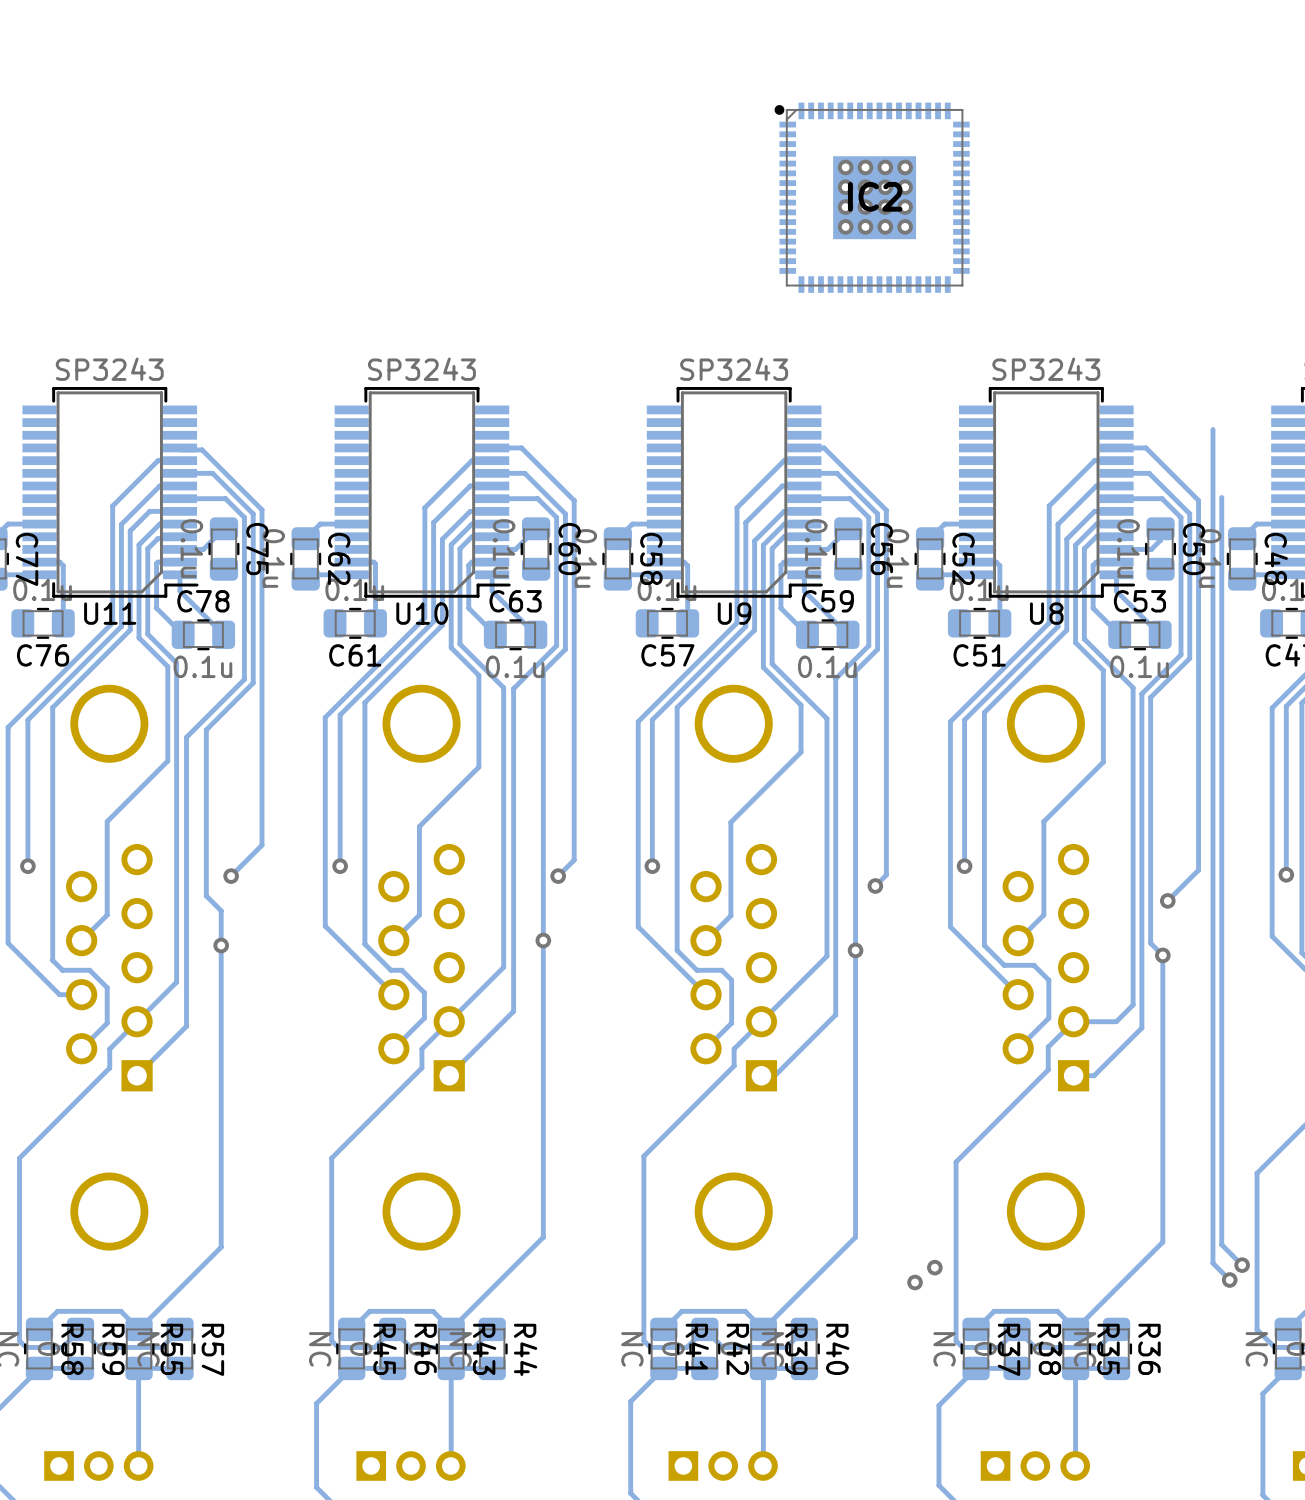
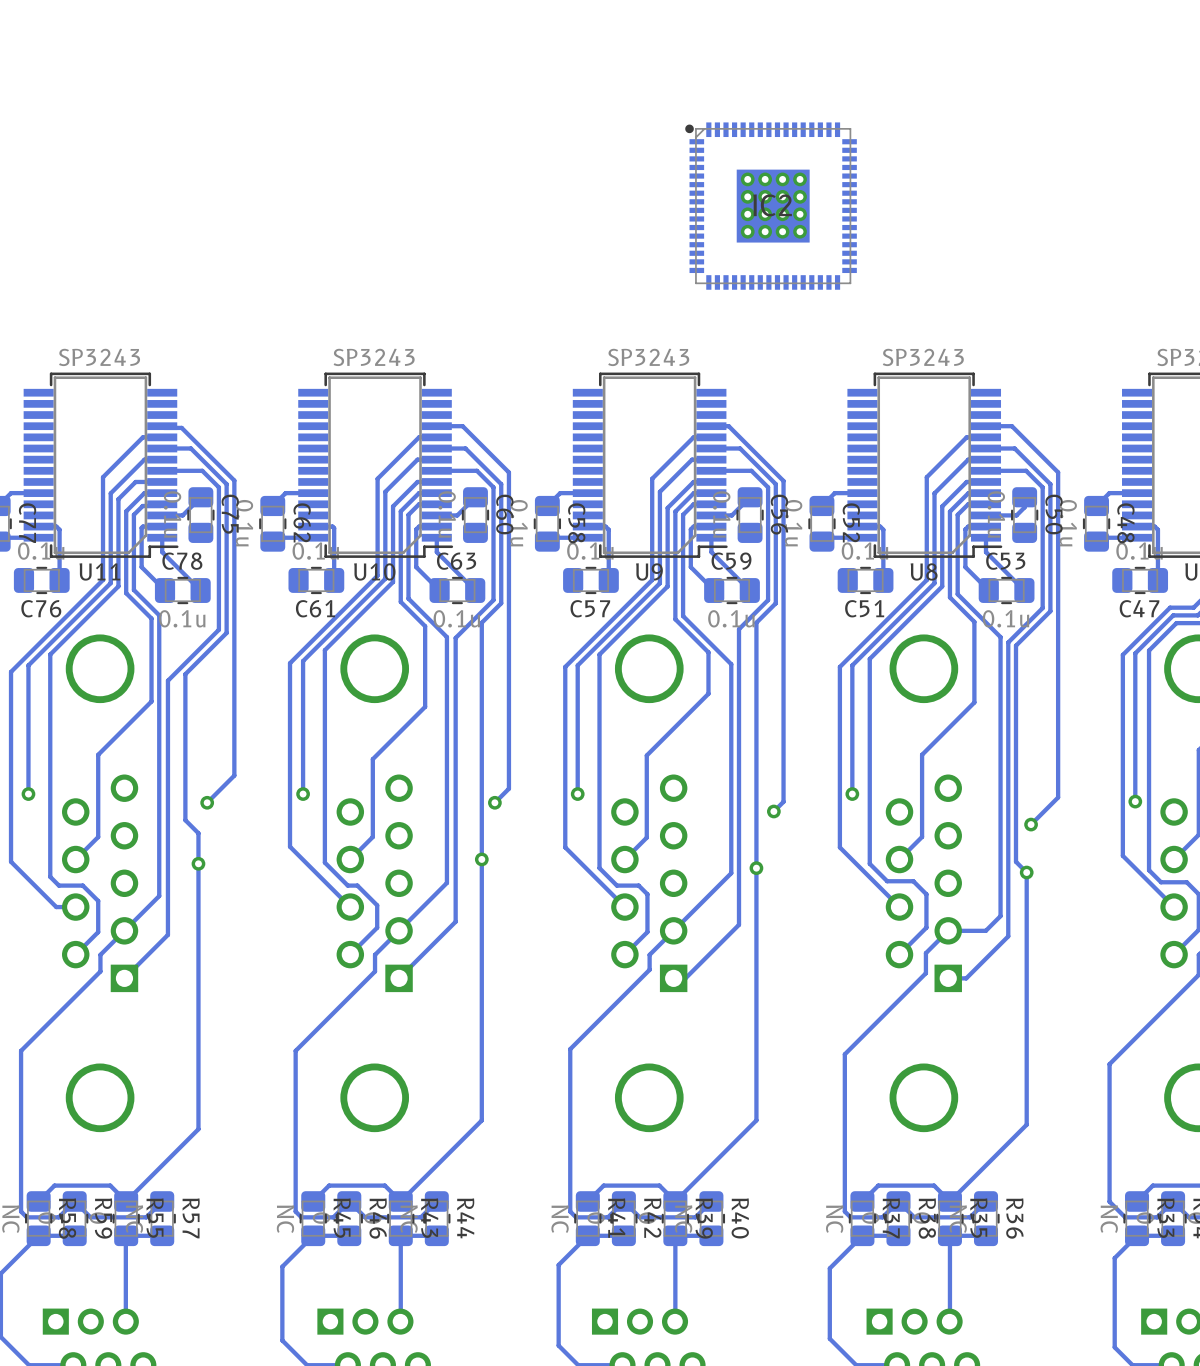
track: (1212, 429) (1212, 1263) (1229, 1280) -> none
track: (1221, 497) (1221, 1244) (1242, 1265) -> none
via: (1242, 1265) -> none
via: (934, 1267) -> none
via: (1229, 1280) -> none
via: (915, 1282) -> none

